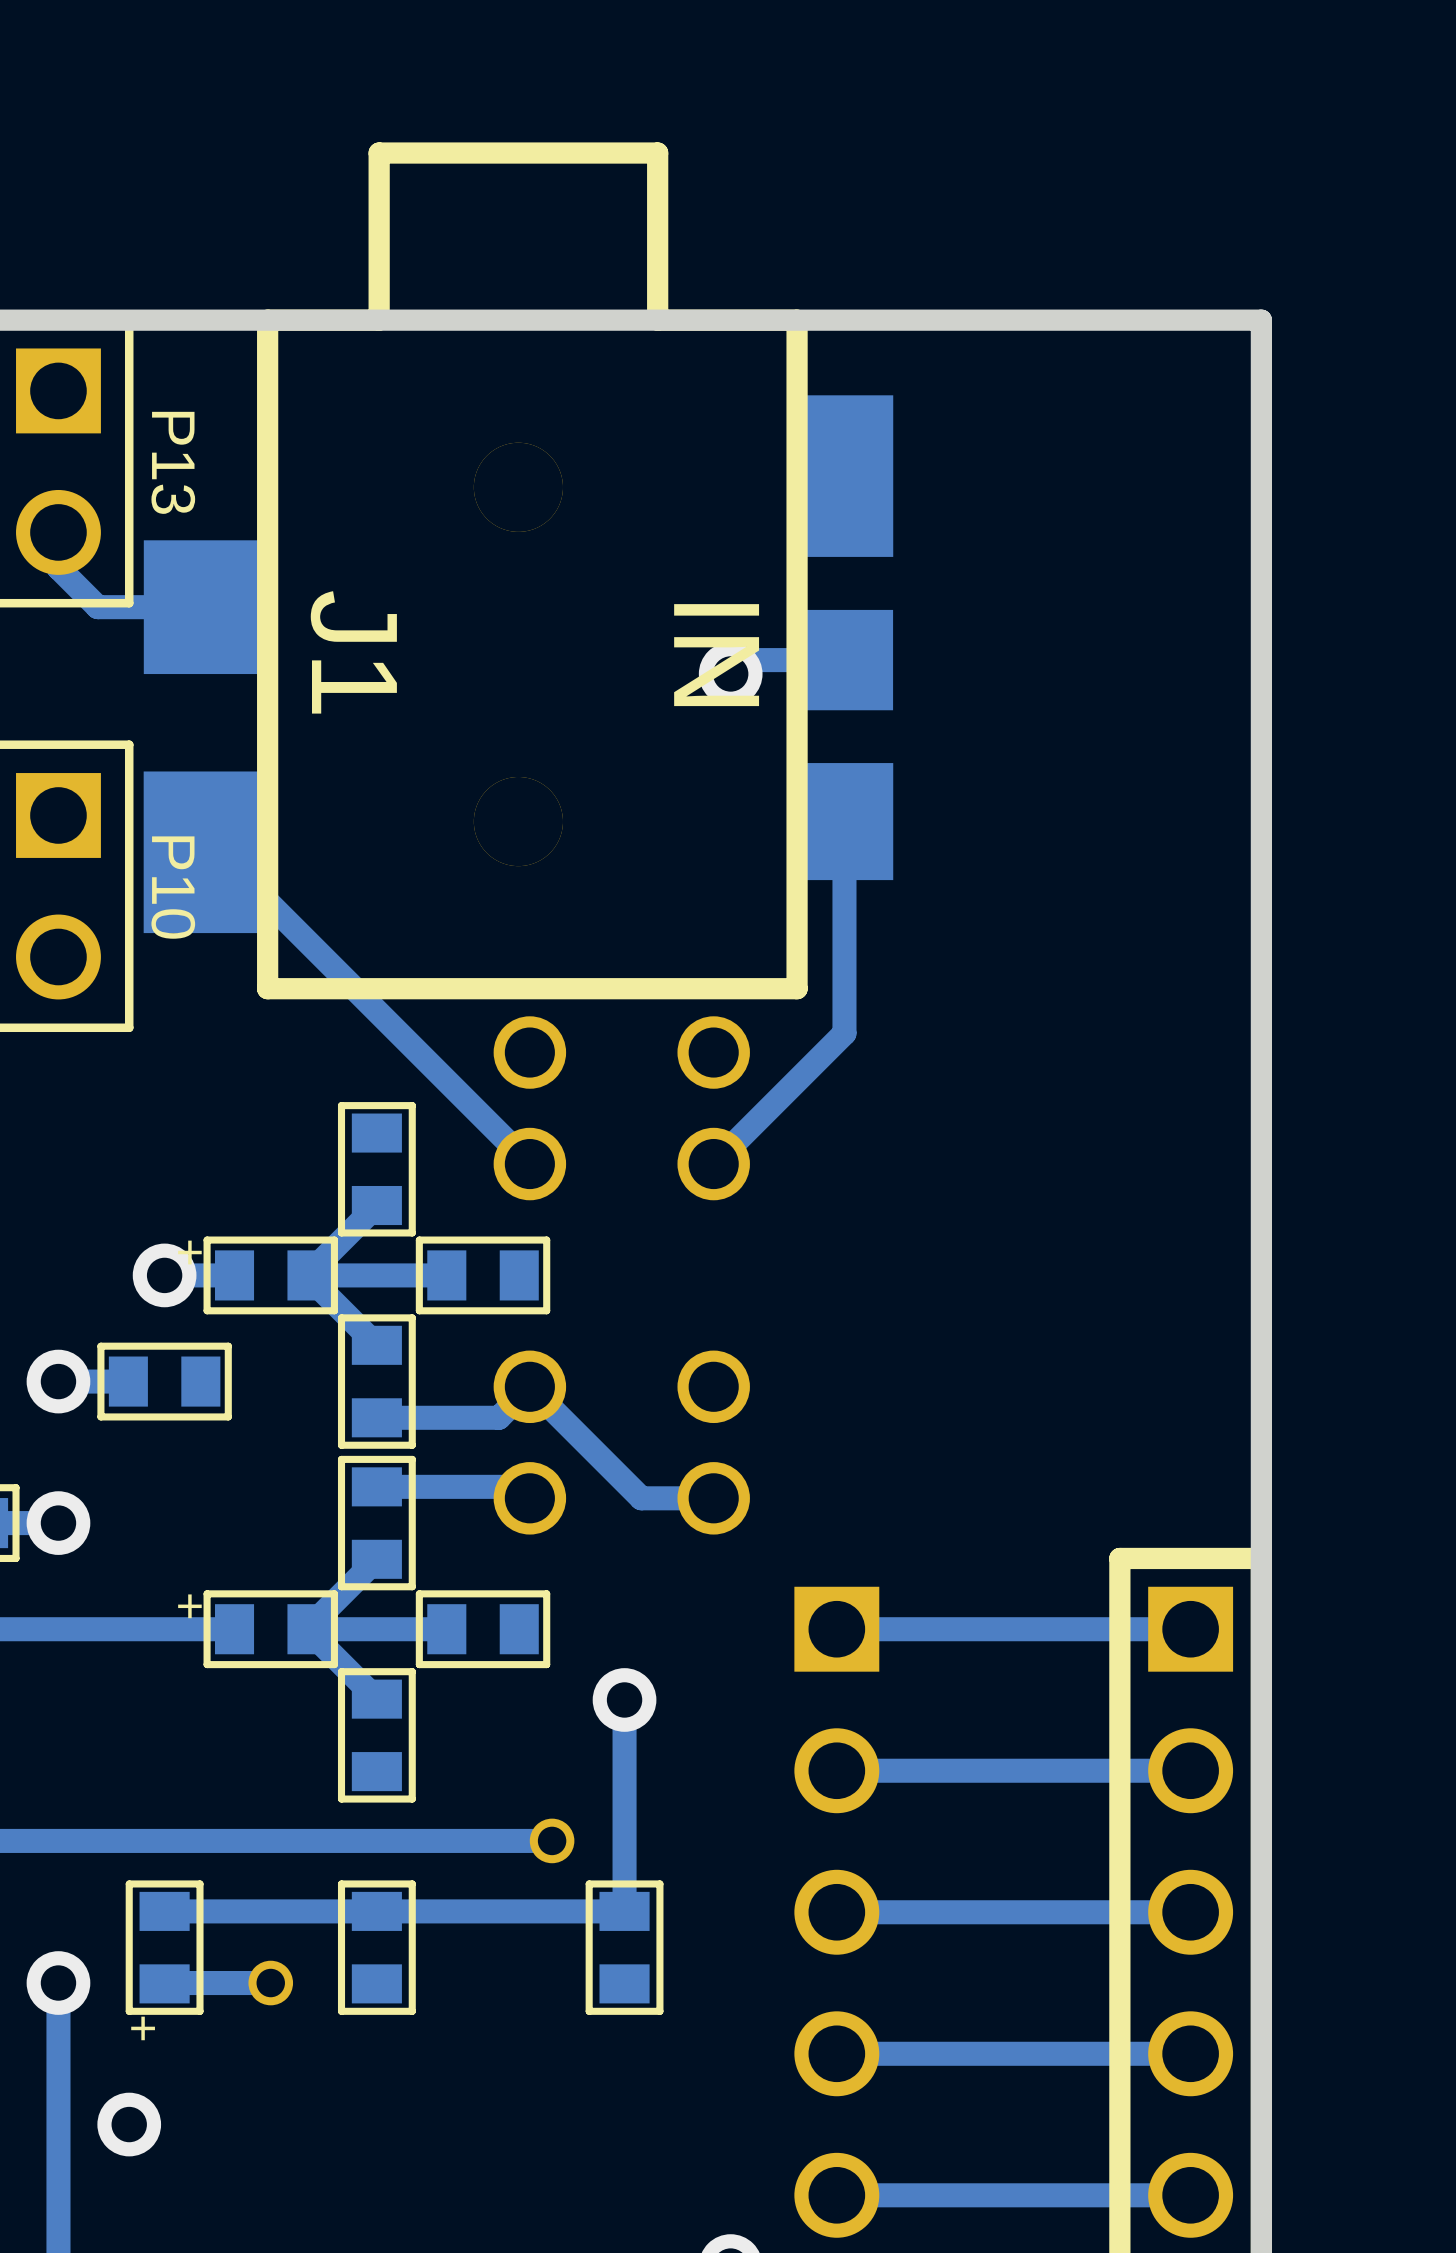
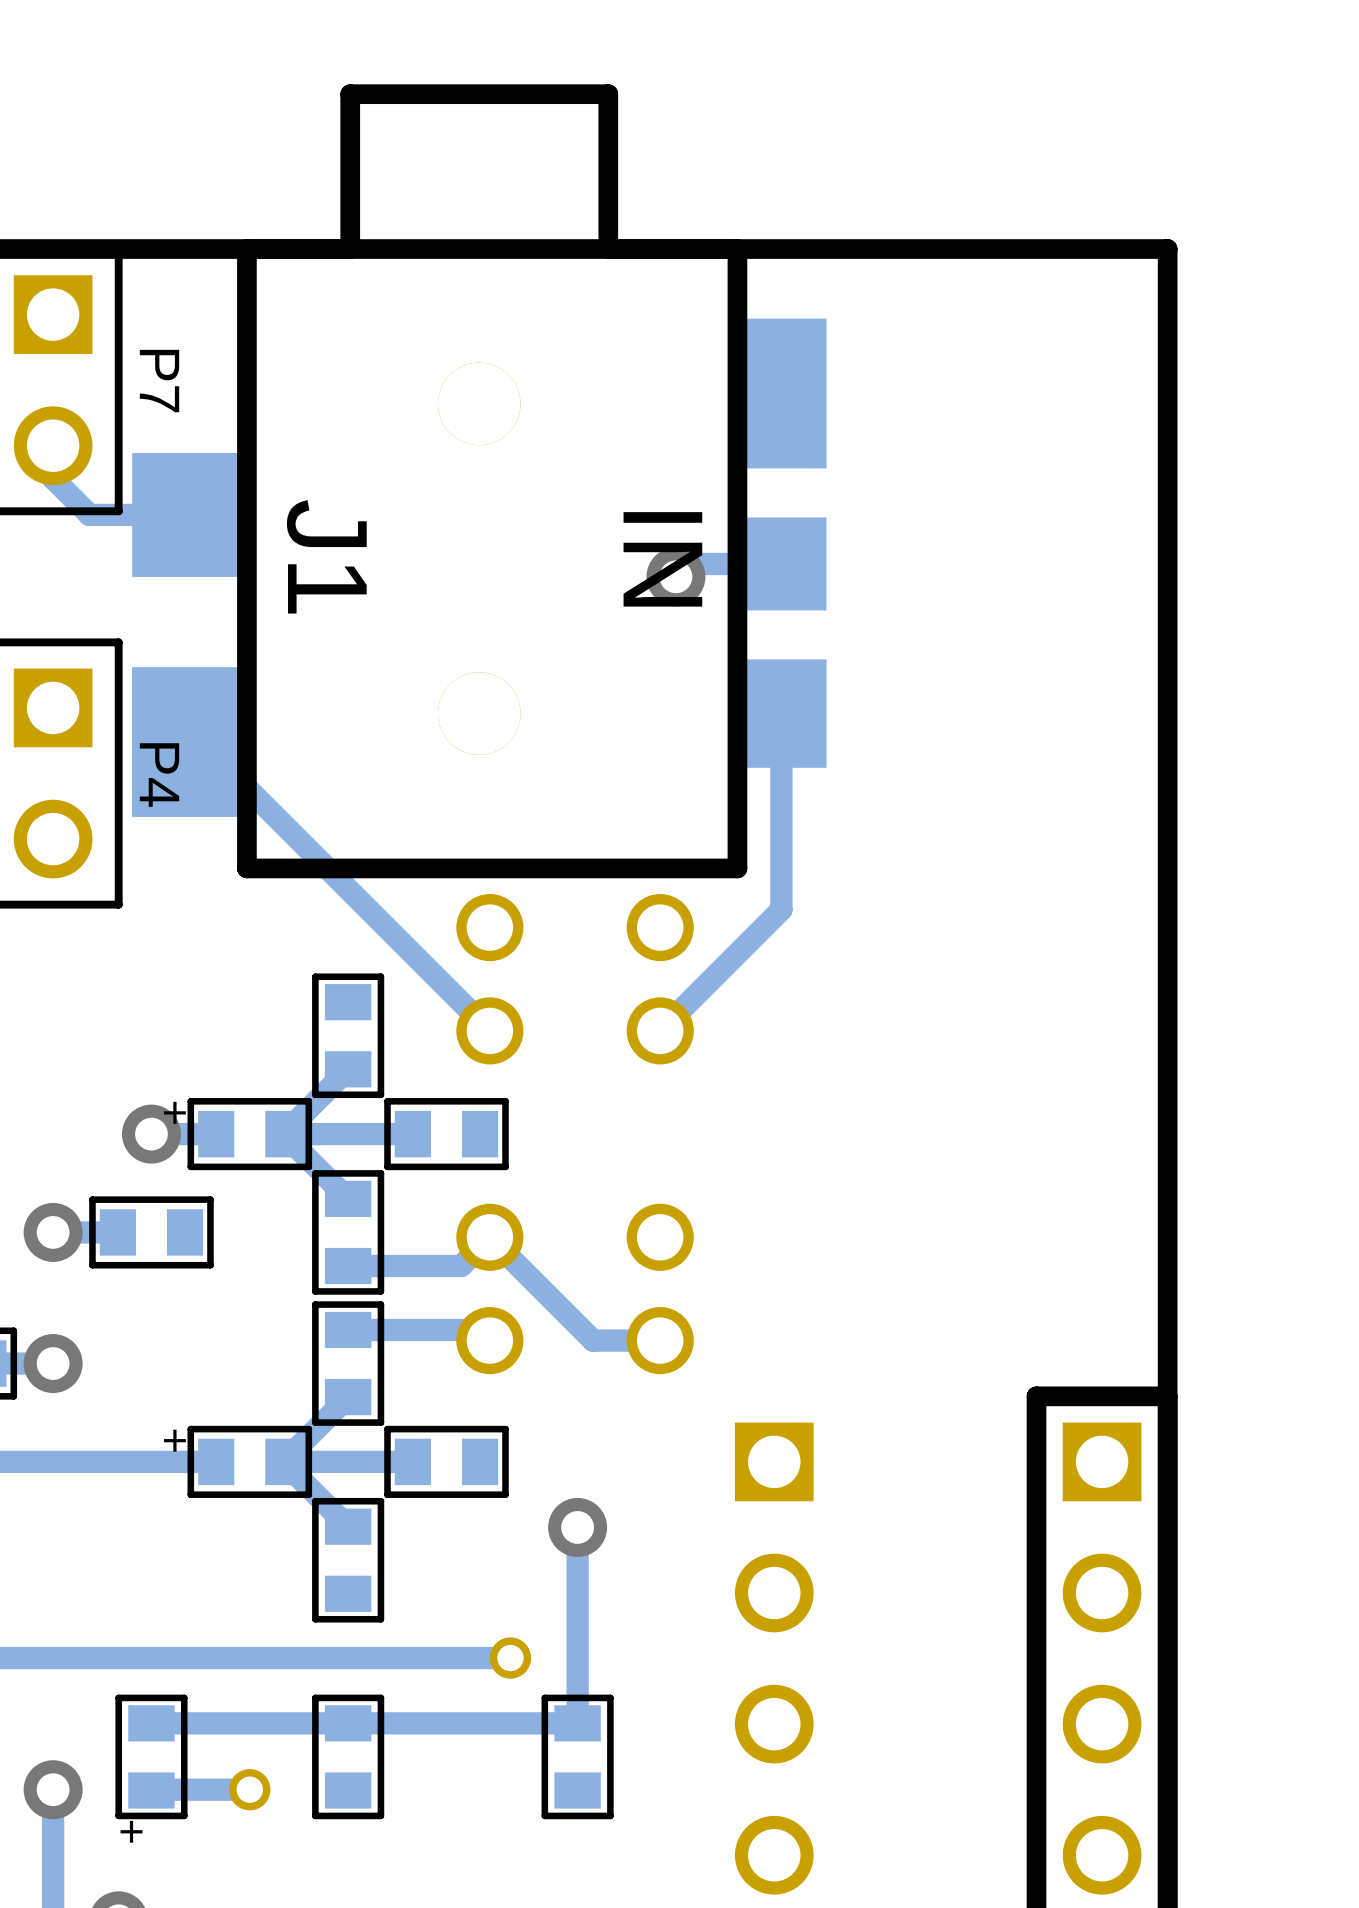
P13 name: P13 (173, 462) -> P7 (159, 381)
P10 name: P10 (173, 887) -> P4 (159, 775)
track: (1190, 1629) (836, 1629) -> none
track: (1190, 1770) (836, 1770) -> none
track: (1190, 1912) (836, 1912) -> none
track: (1190, 2053) (836, 2053) -> none

